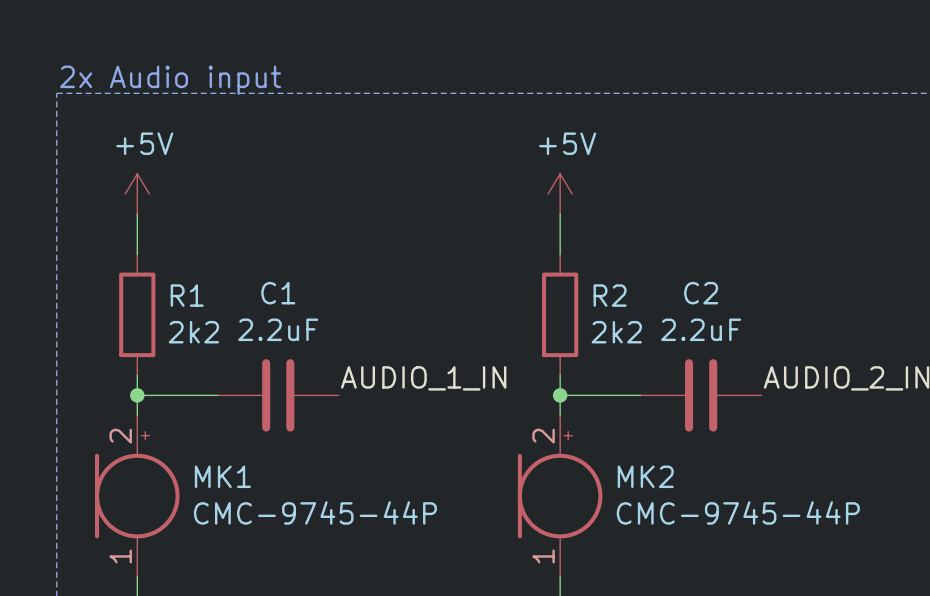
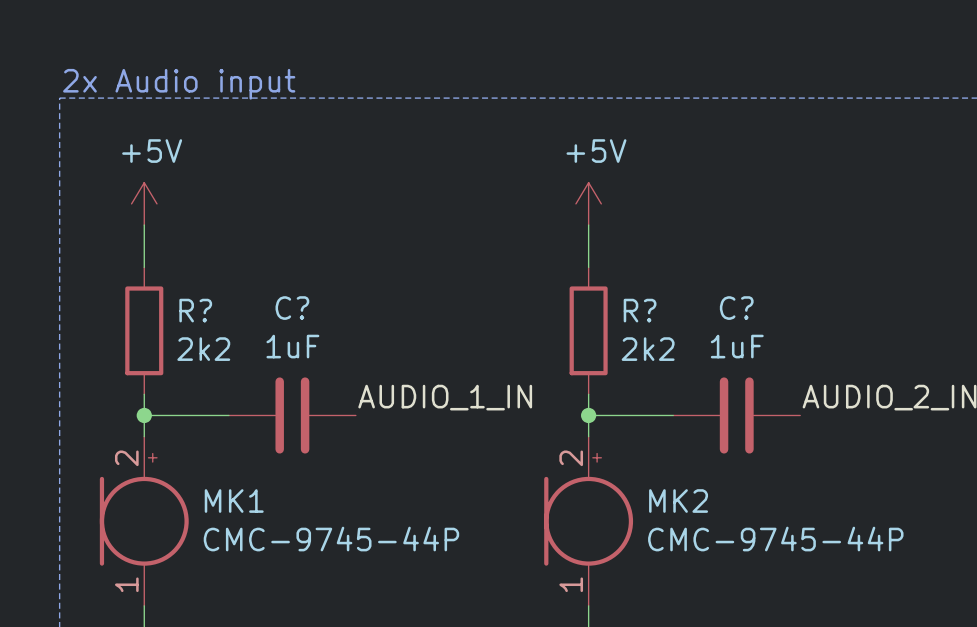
C1 name: C1 (278, 293) -> C? (292, 308)
C2 name: C2 (701, 293) -> C? (736, 308)
R1 name: R1 (187, 295) -> R? (195, 310)
R2 name: R2 (610, 295) -> R? (640, 310)
C1 value: 2.2uF (278, 329) -> 1uF (292, 346)
C2 value: 2.2uF (701, 329) -> 1uF (737, 346)

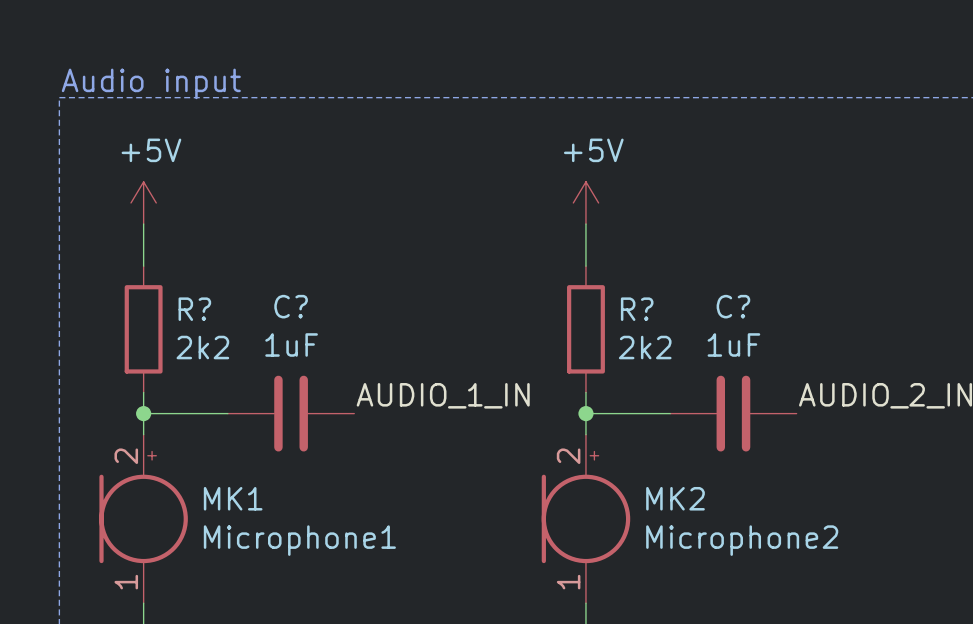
text: 2x Audio input (179, 84) -> Audio input (151, 83)
MK1 value: CMC-9745-44P (331, 539) -> Microphone1 (299, 540)
MK2 value: CMC-9745-44P (775, 539) -> Microphone2 (742, 540)

